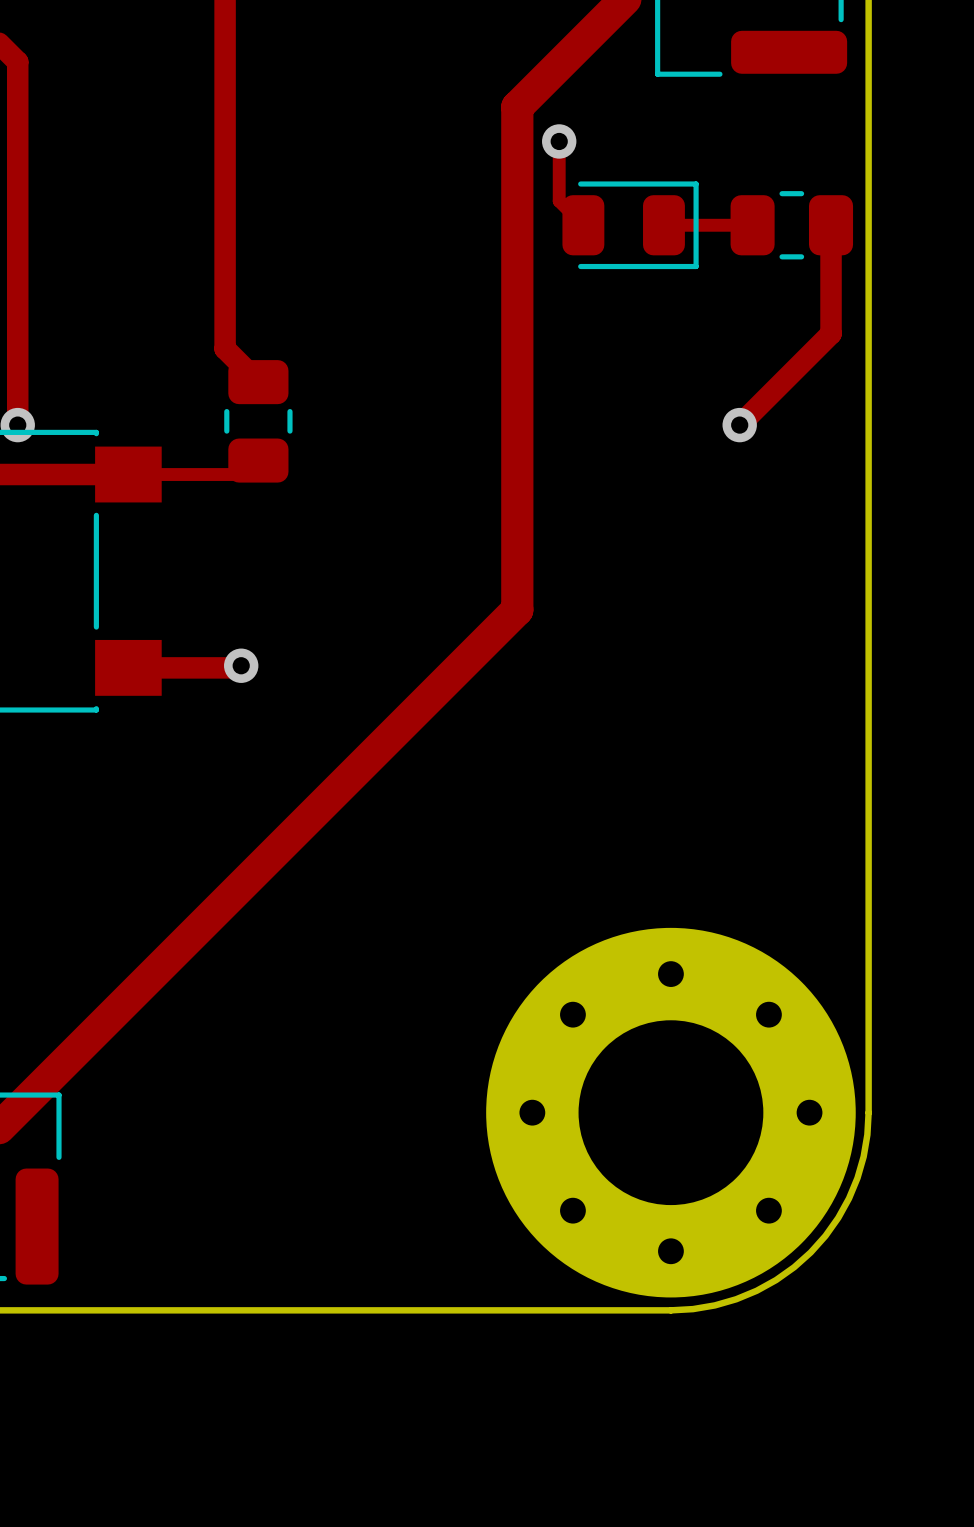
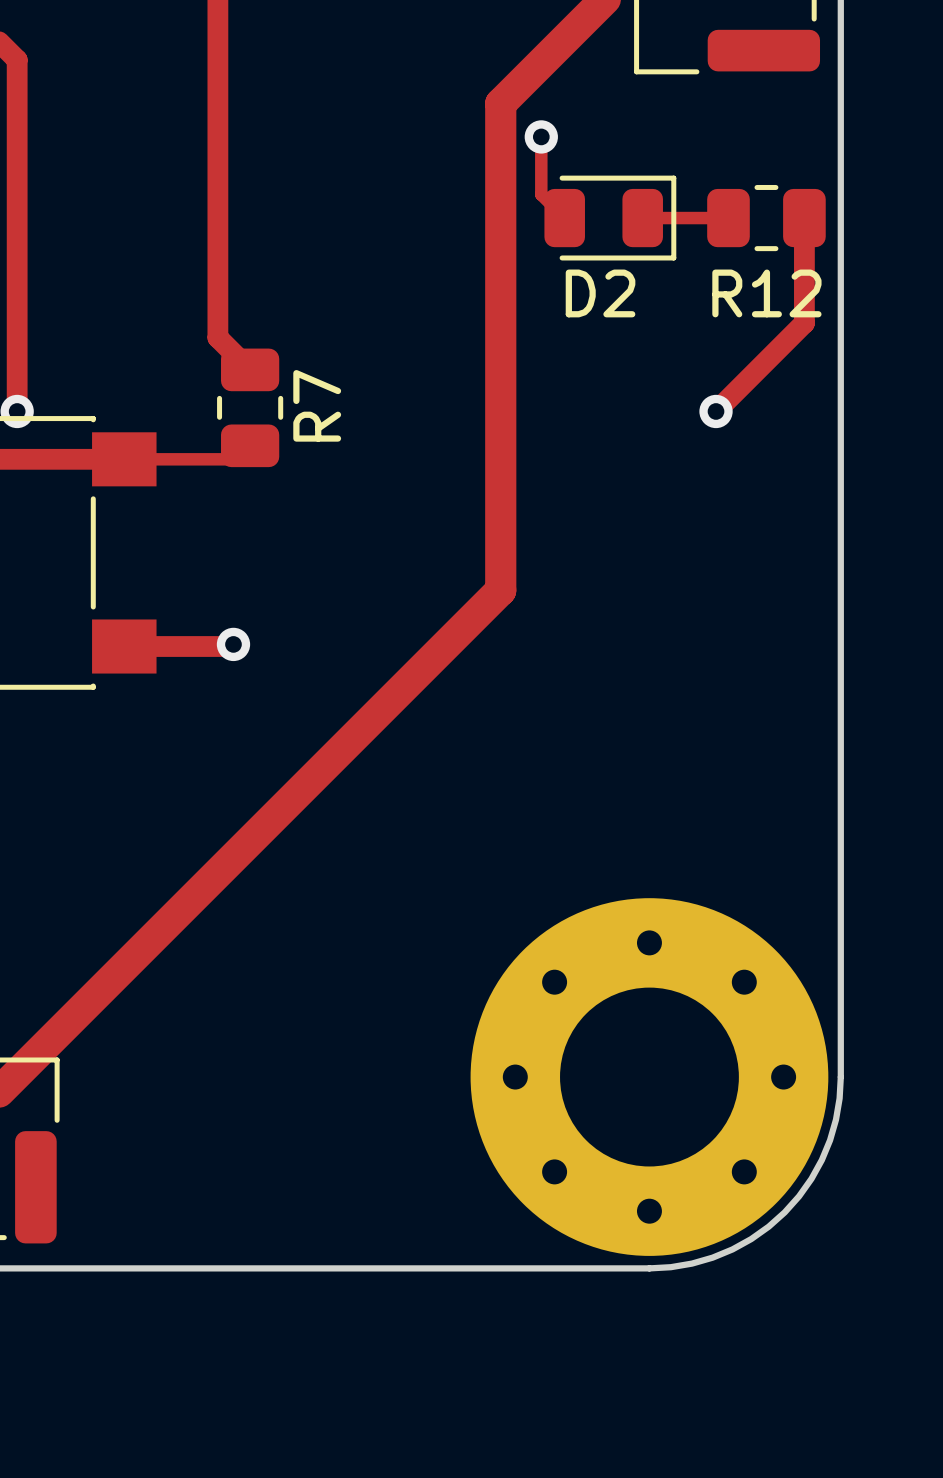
D2 name: none -> D2 (600, 293)
R12 name: none -> R12 (766, 293)
R7 name: none -> R7 (317, 405)

